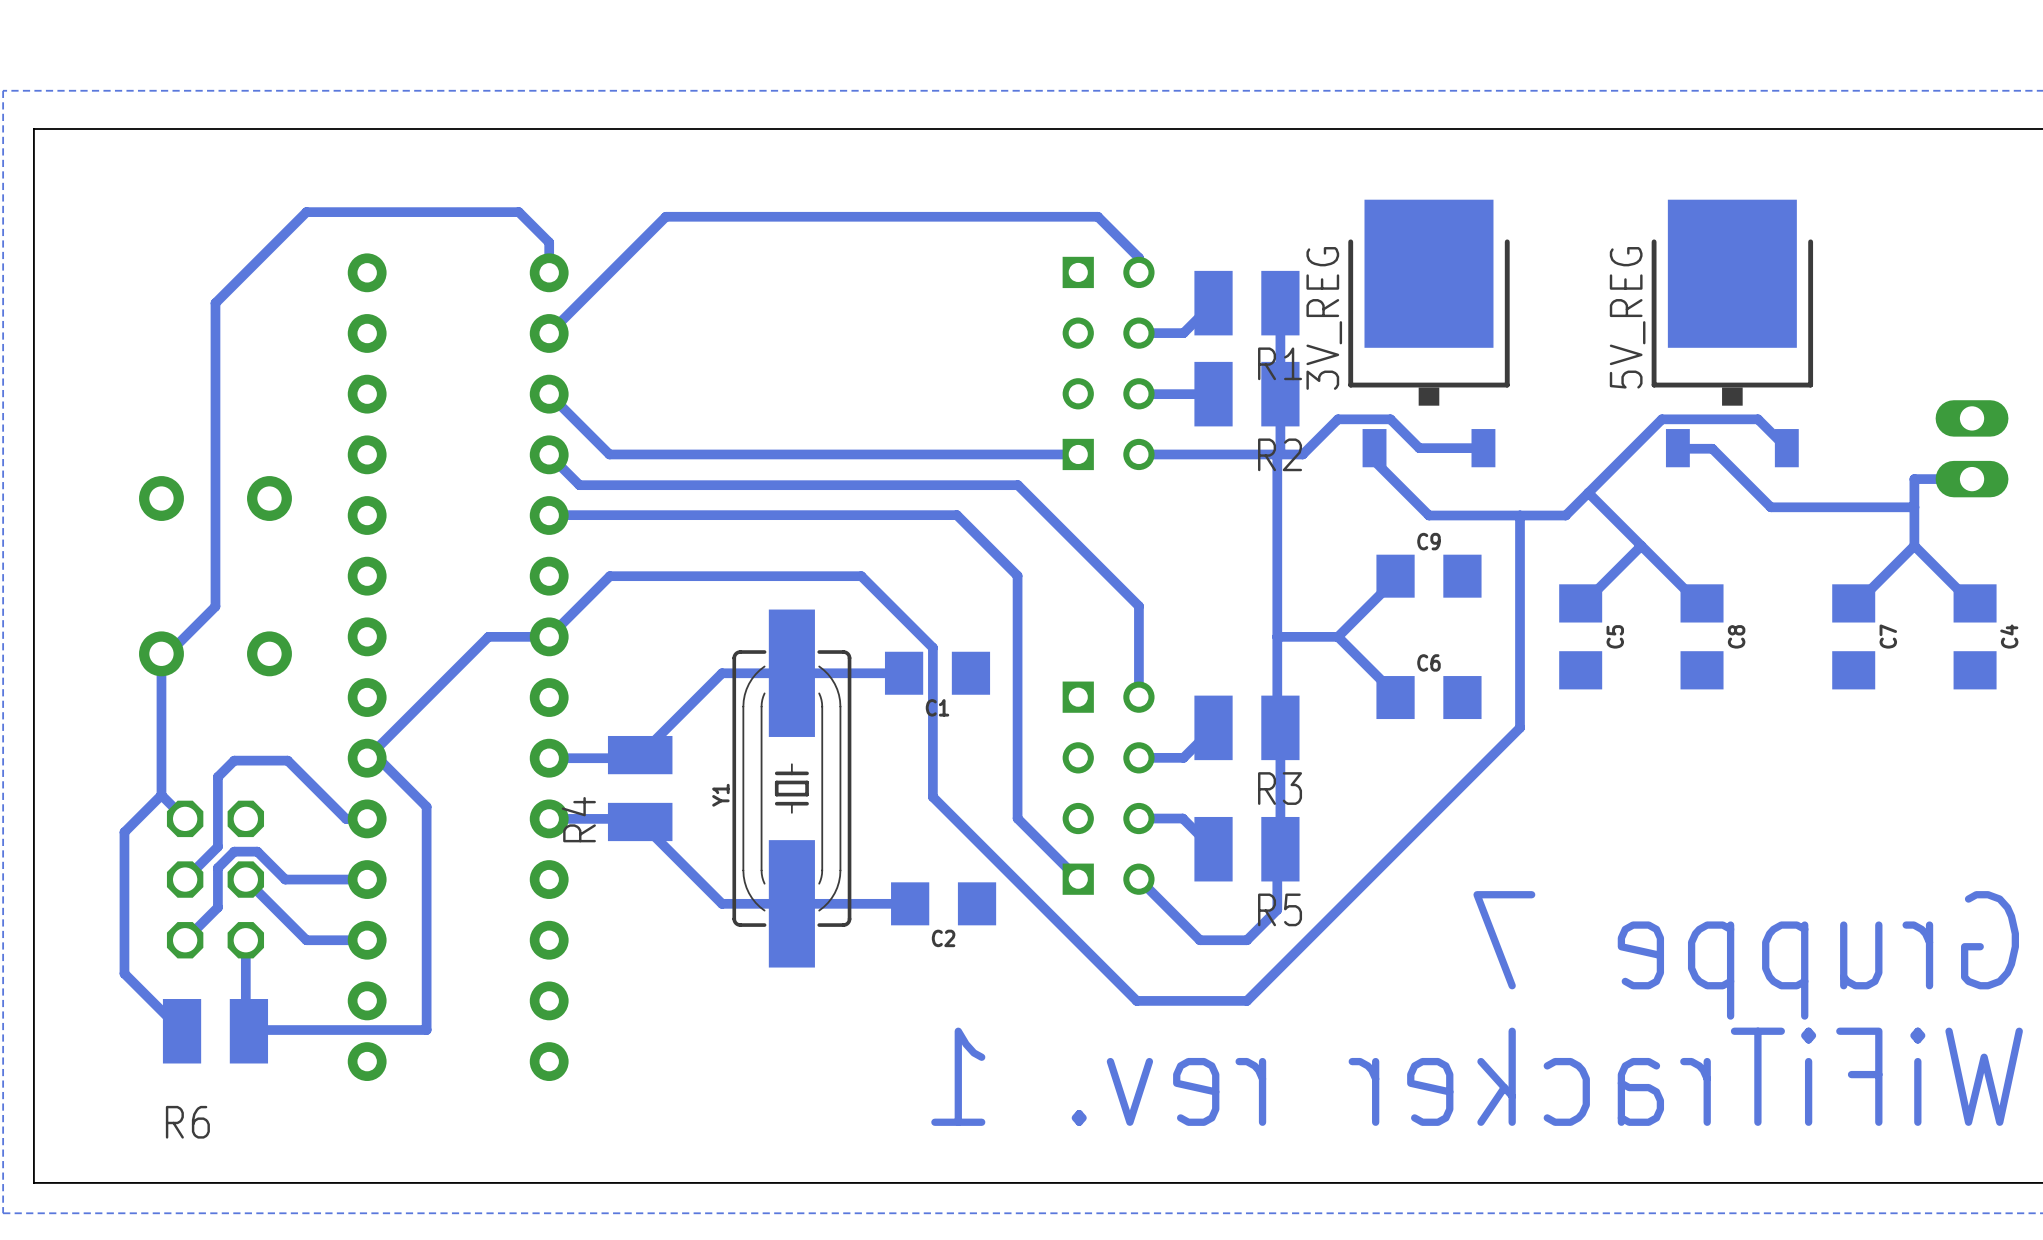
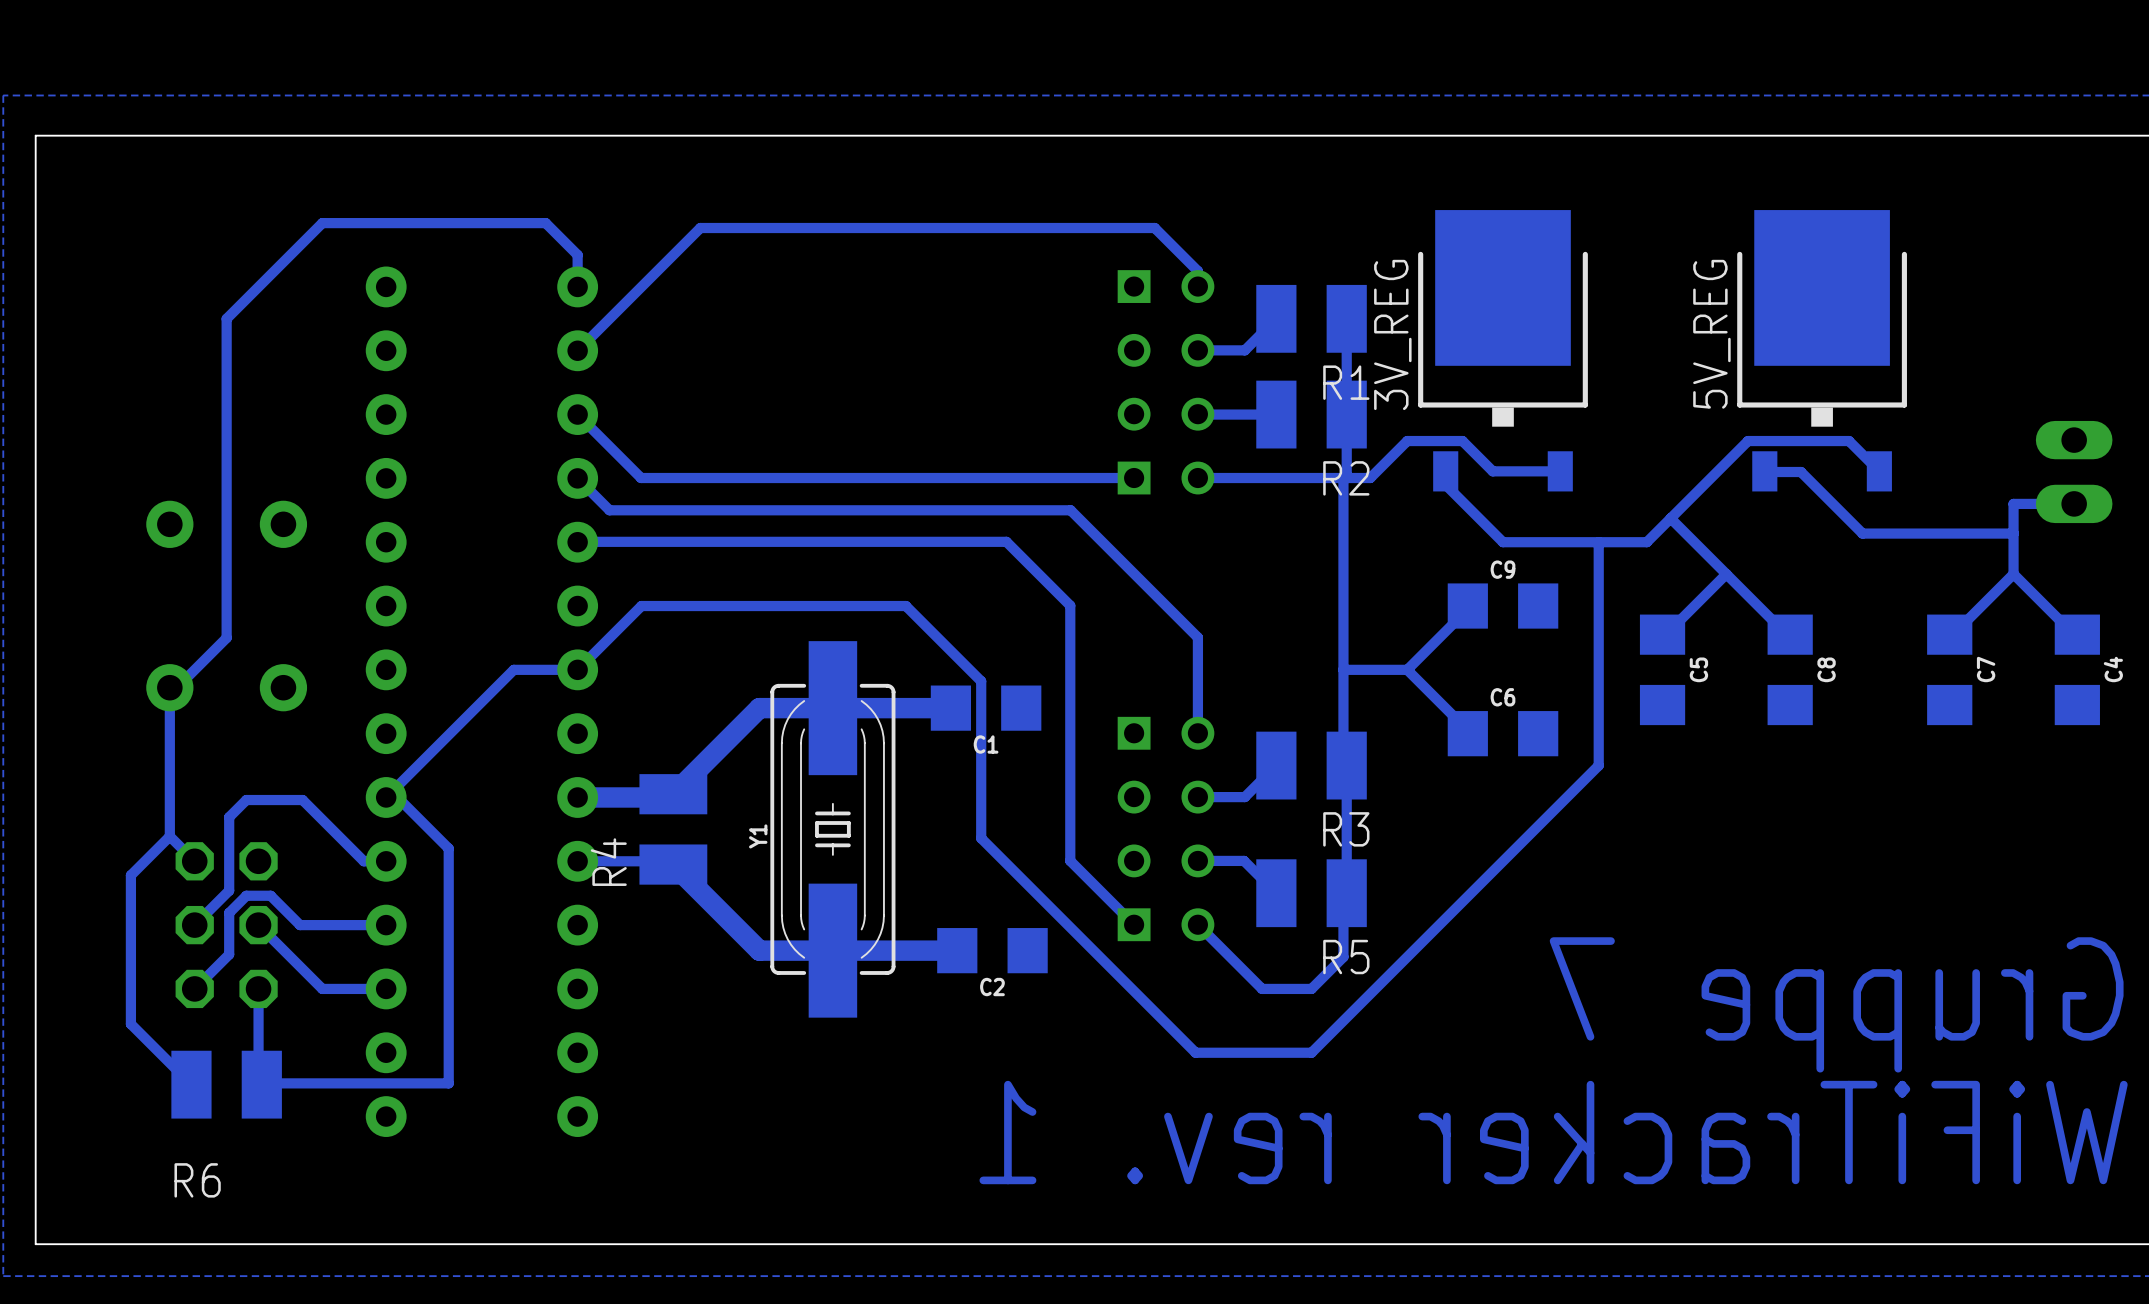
track width: thin (904, 673) (722, 673) (640, 755) -> thick (950, 708) (759, 708) (673, 794)
track width: thin (634, 758) (549, 758) -> thick (667, 797) (577, 797)
track width: thin (640, 821) (722, 903) (910, 903) -> thick (673, 864) (759, 950) (957, 950)

